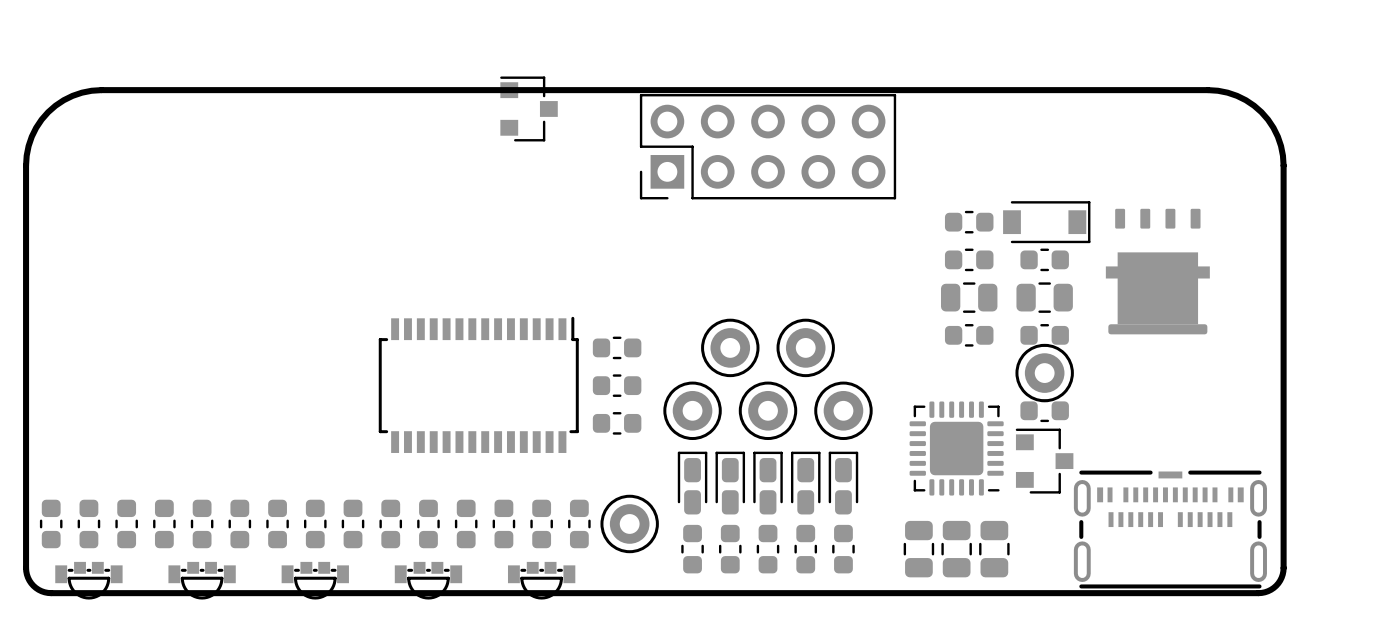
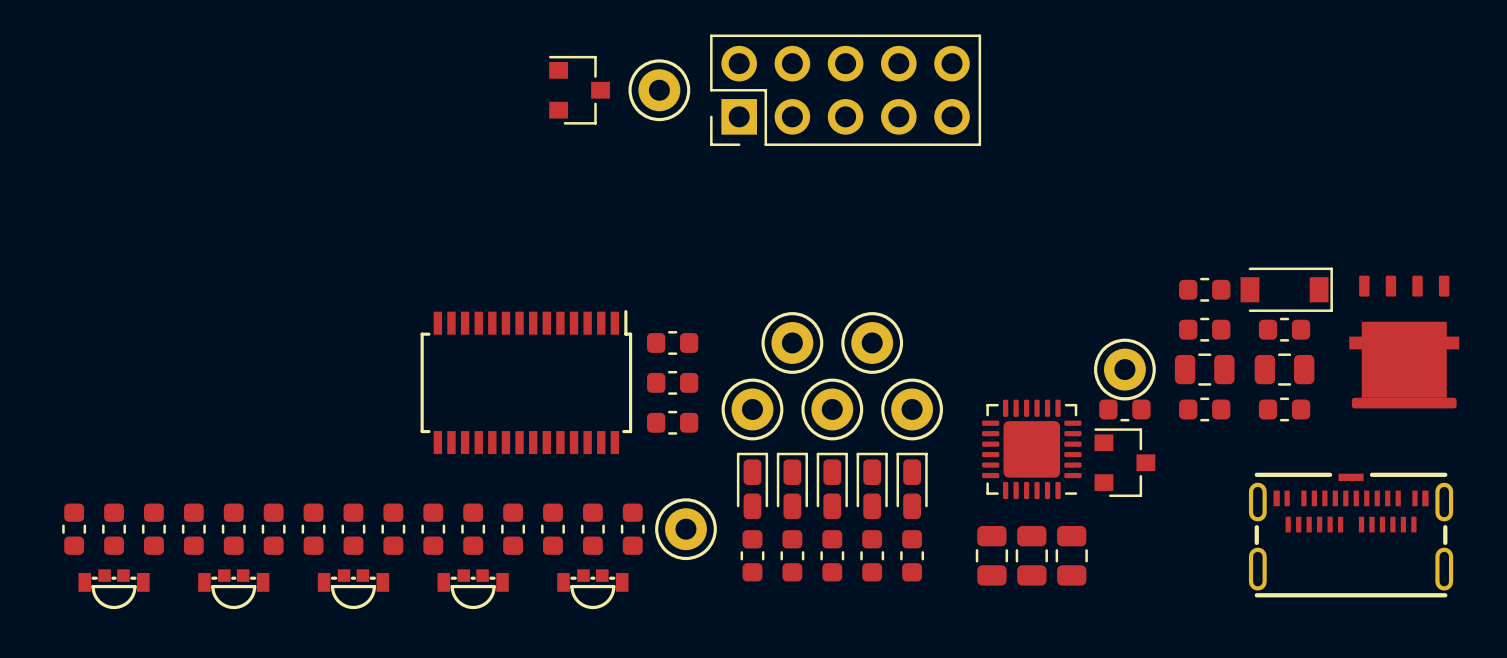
board edge: (101, 90) (1208, 90) (1237, 95) (1254, 105) (1268, 119) (1277, 136) (1282, 155) (1283, 567) (1281, 577) (1271, 589) (1258, 593) (51, 593) (41, 591) (29, 580) (26, 567) (26, 155) (36, 127) (48, 112) (72, 95) (101, 90) -> none
part: none -> (659, 90)
part position: (768, 146) -> (845, 90)
part: (969, 222) -> none
part position: (1046, 222) -> (1286, 289)
part: (969, 259) -> none
part: (1044, 259) -> none
part position: (1157, 271) -> (1404, 342)
part: (969, 297) -> none
part: (1044, 297) -> none
part: none -> (1204, 289)
part: (969, 335) -> none
part: (1044, 335) -> none
part: none -> (1204, 329)
part: none -> (1284, 329)
part: none -> (1204, 369)
part: none -> (1284, 369)
part: none -> (1204, 409)
part: none -> (1284, 409)
part position: (1170, 529) -> (1351, 535)

